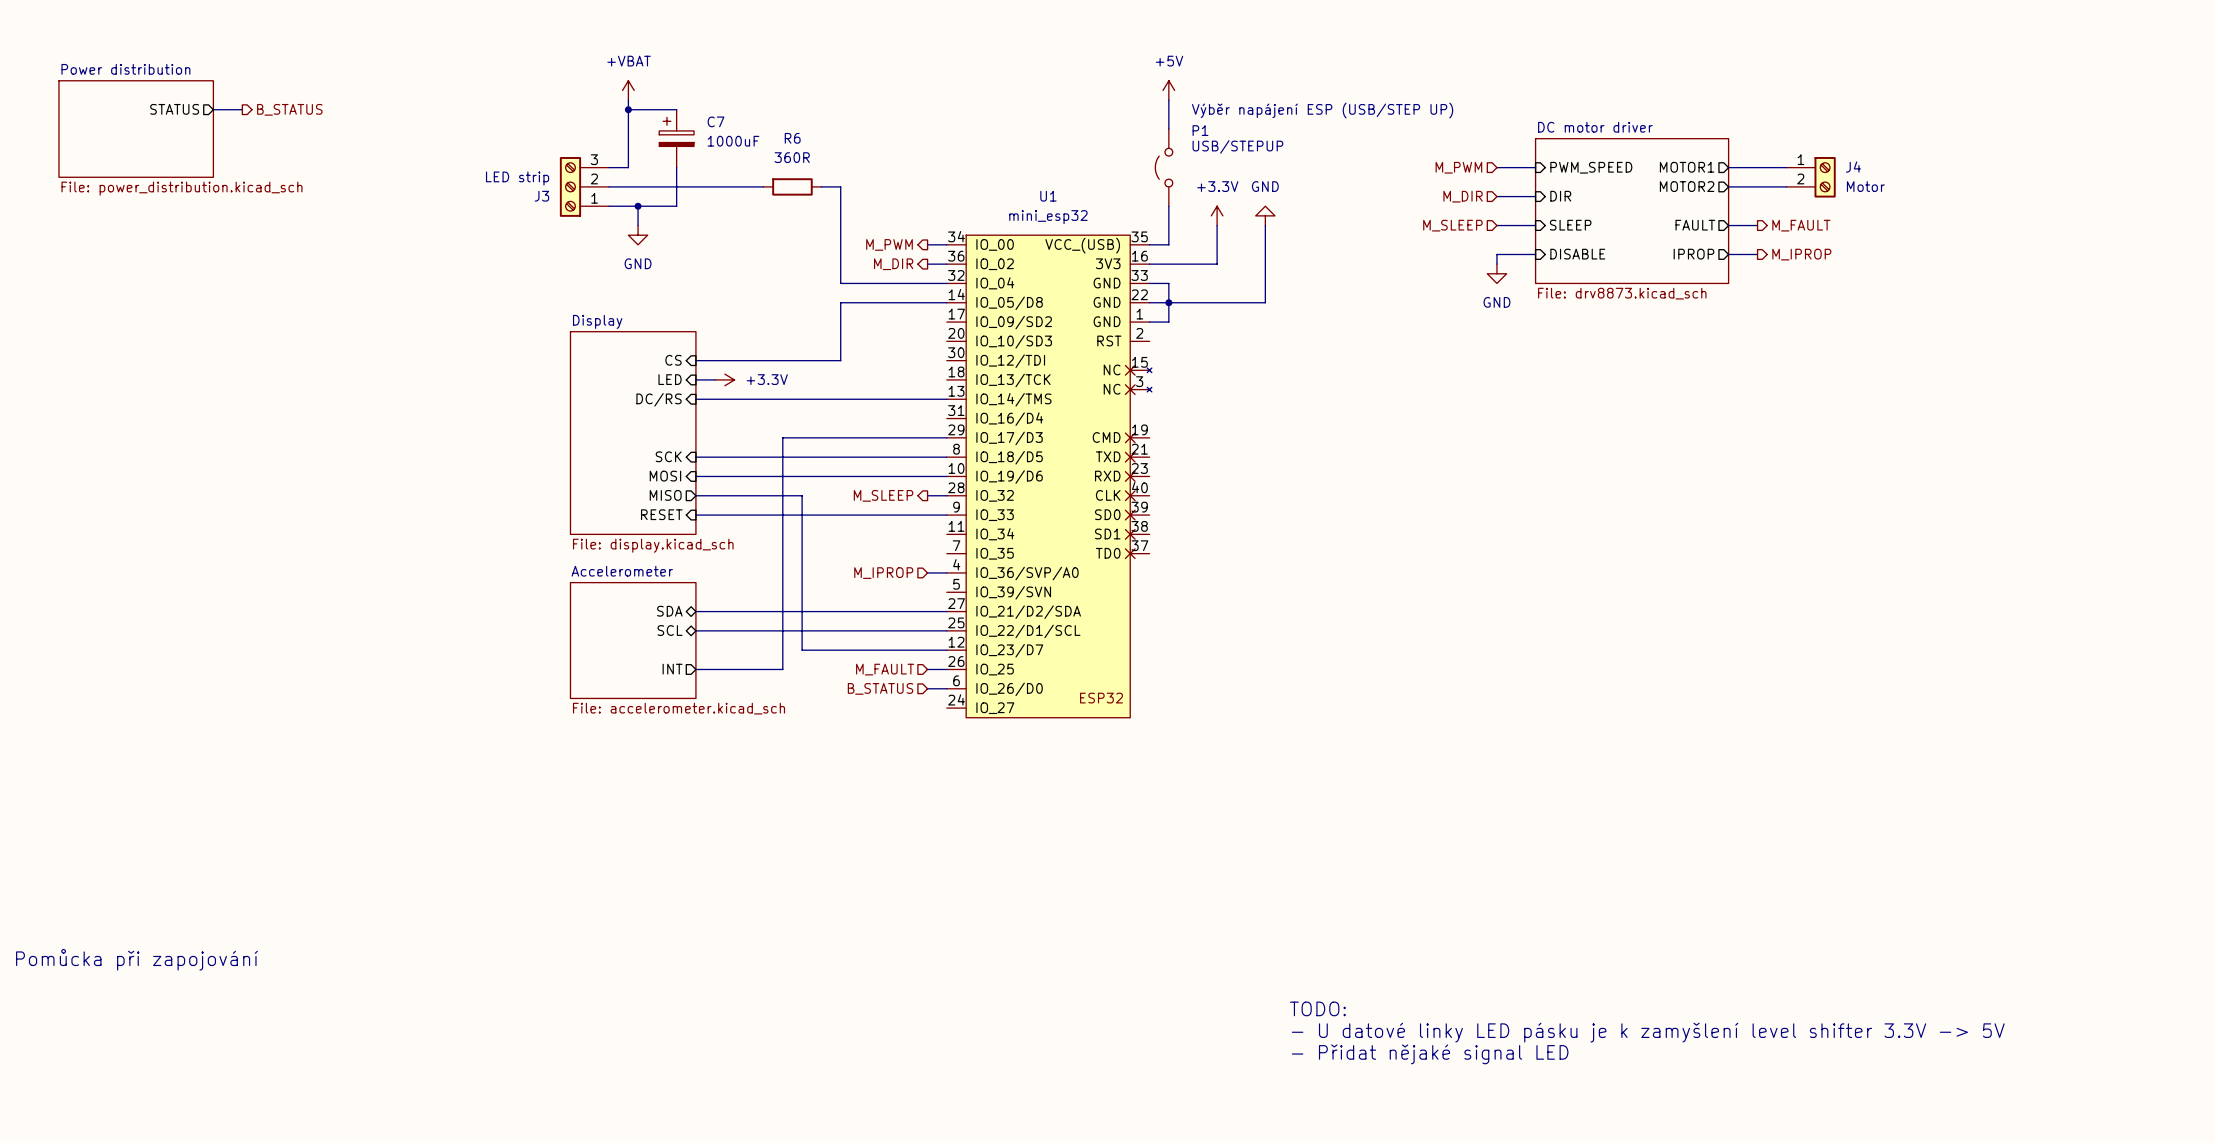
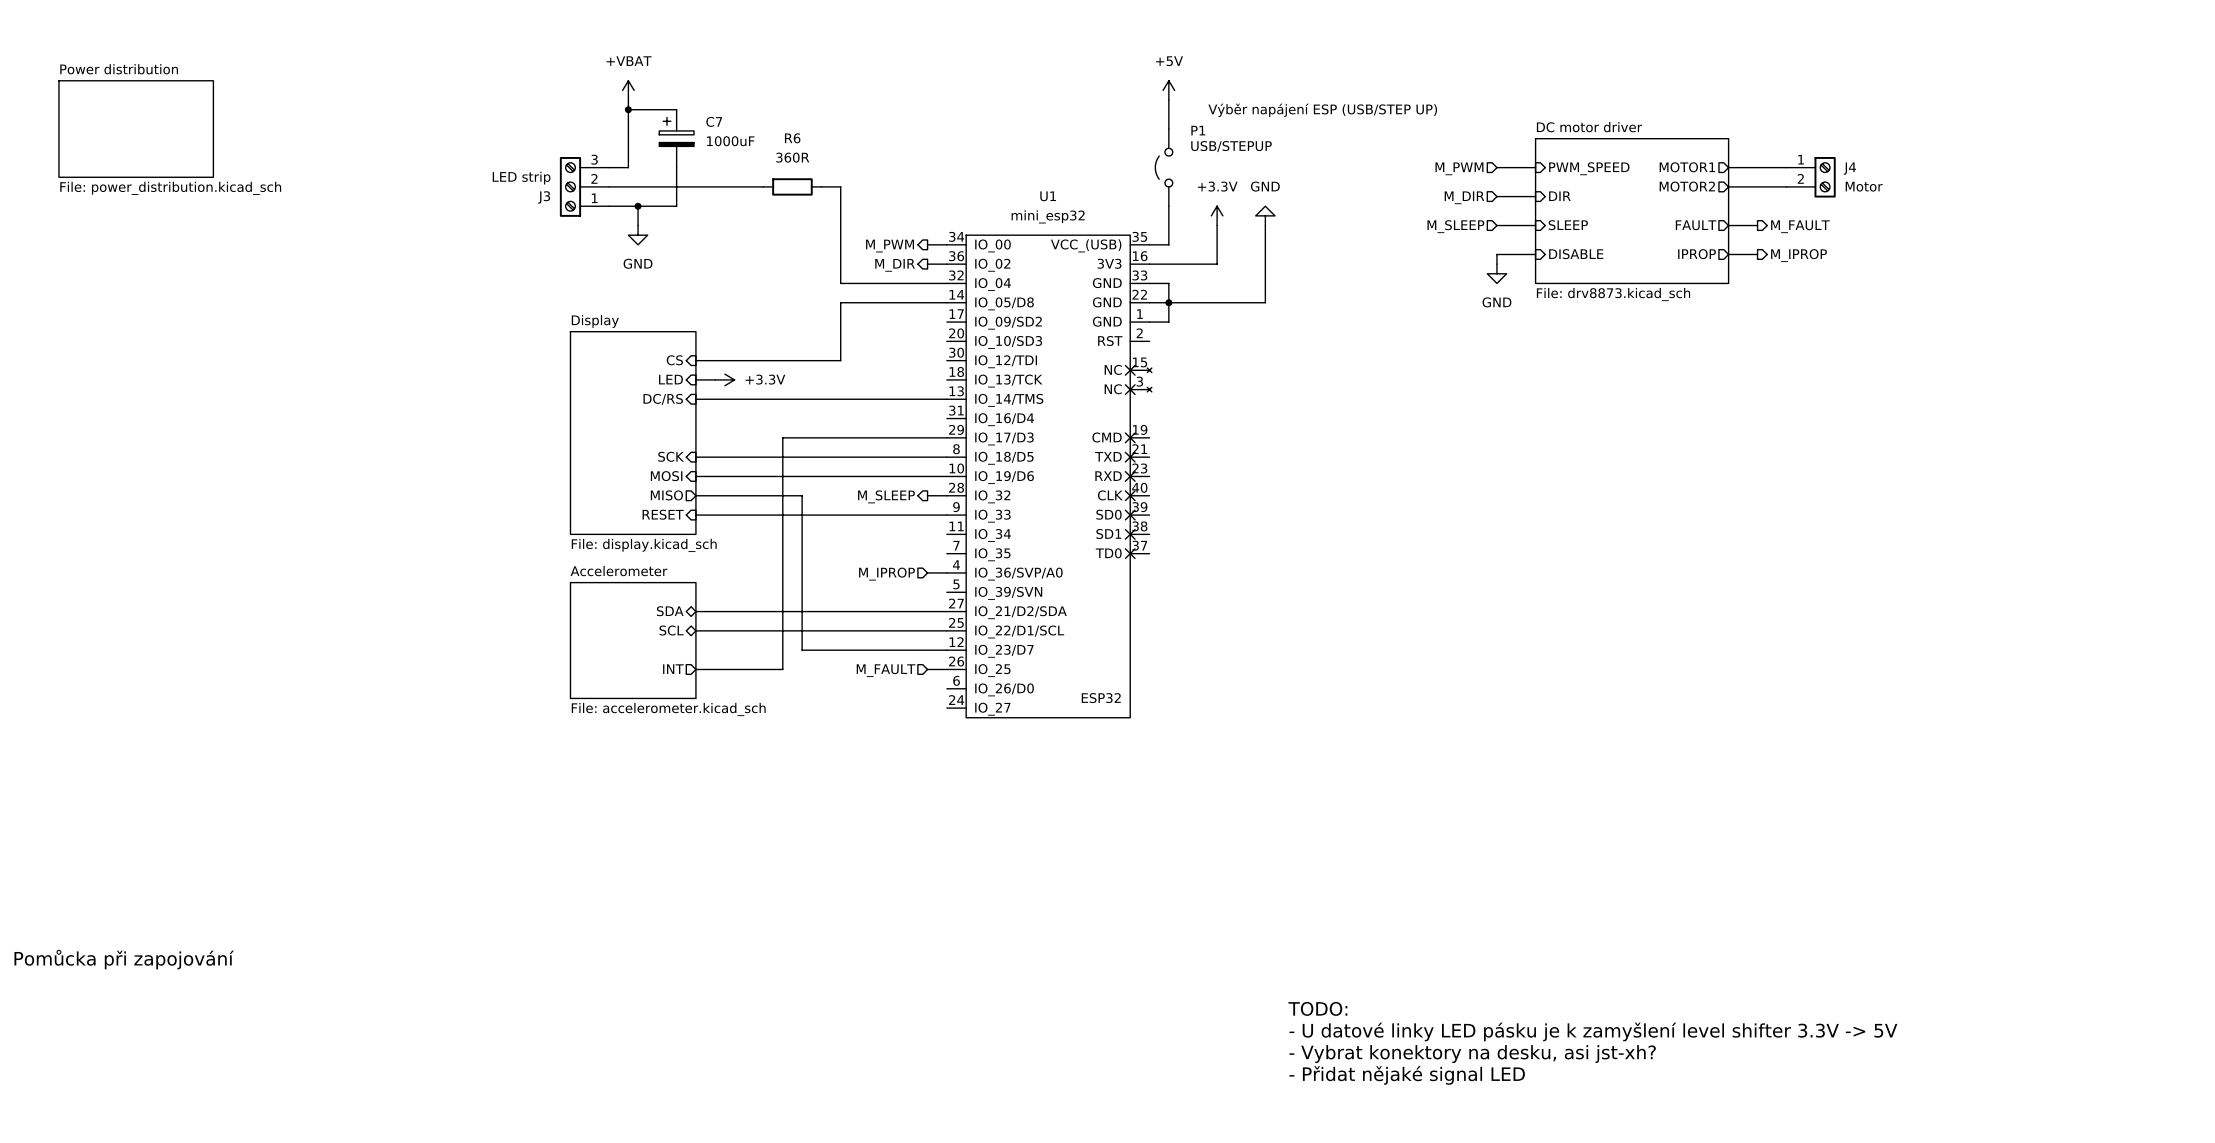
sheet pin: STATUS (174, 109) -> none
wire: (213, 109) (242, 109) -> none
hierarchical label: B_STATUS (289, 109) -> none
hierarchical label: B_STATUS (880, 688) -> none
wire: (927, 688) (946, 688) -> none
text: - Přidat nějaké signal LED (1430, 1054) -> - Vybrat konektory na desku, asi jst-xh? (1472, 1054)
text: none -> - Přidat nějaké signal LED (1407, 1075)

